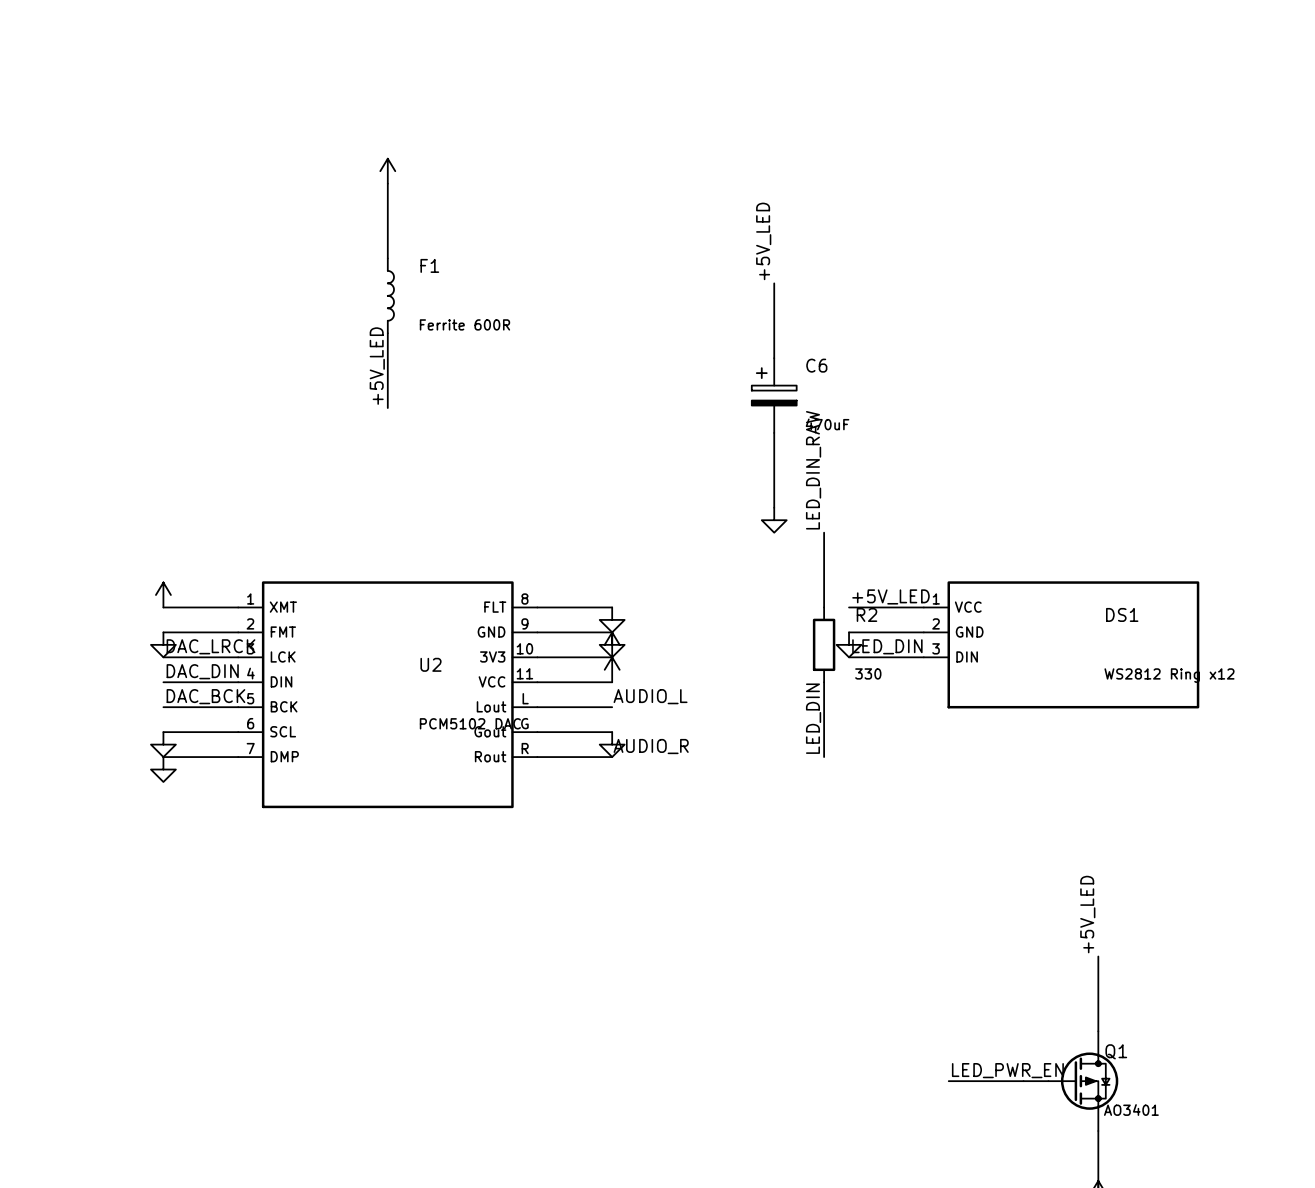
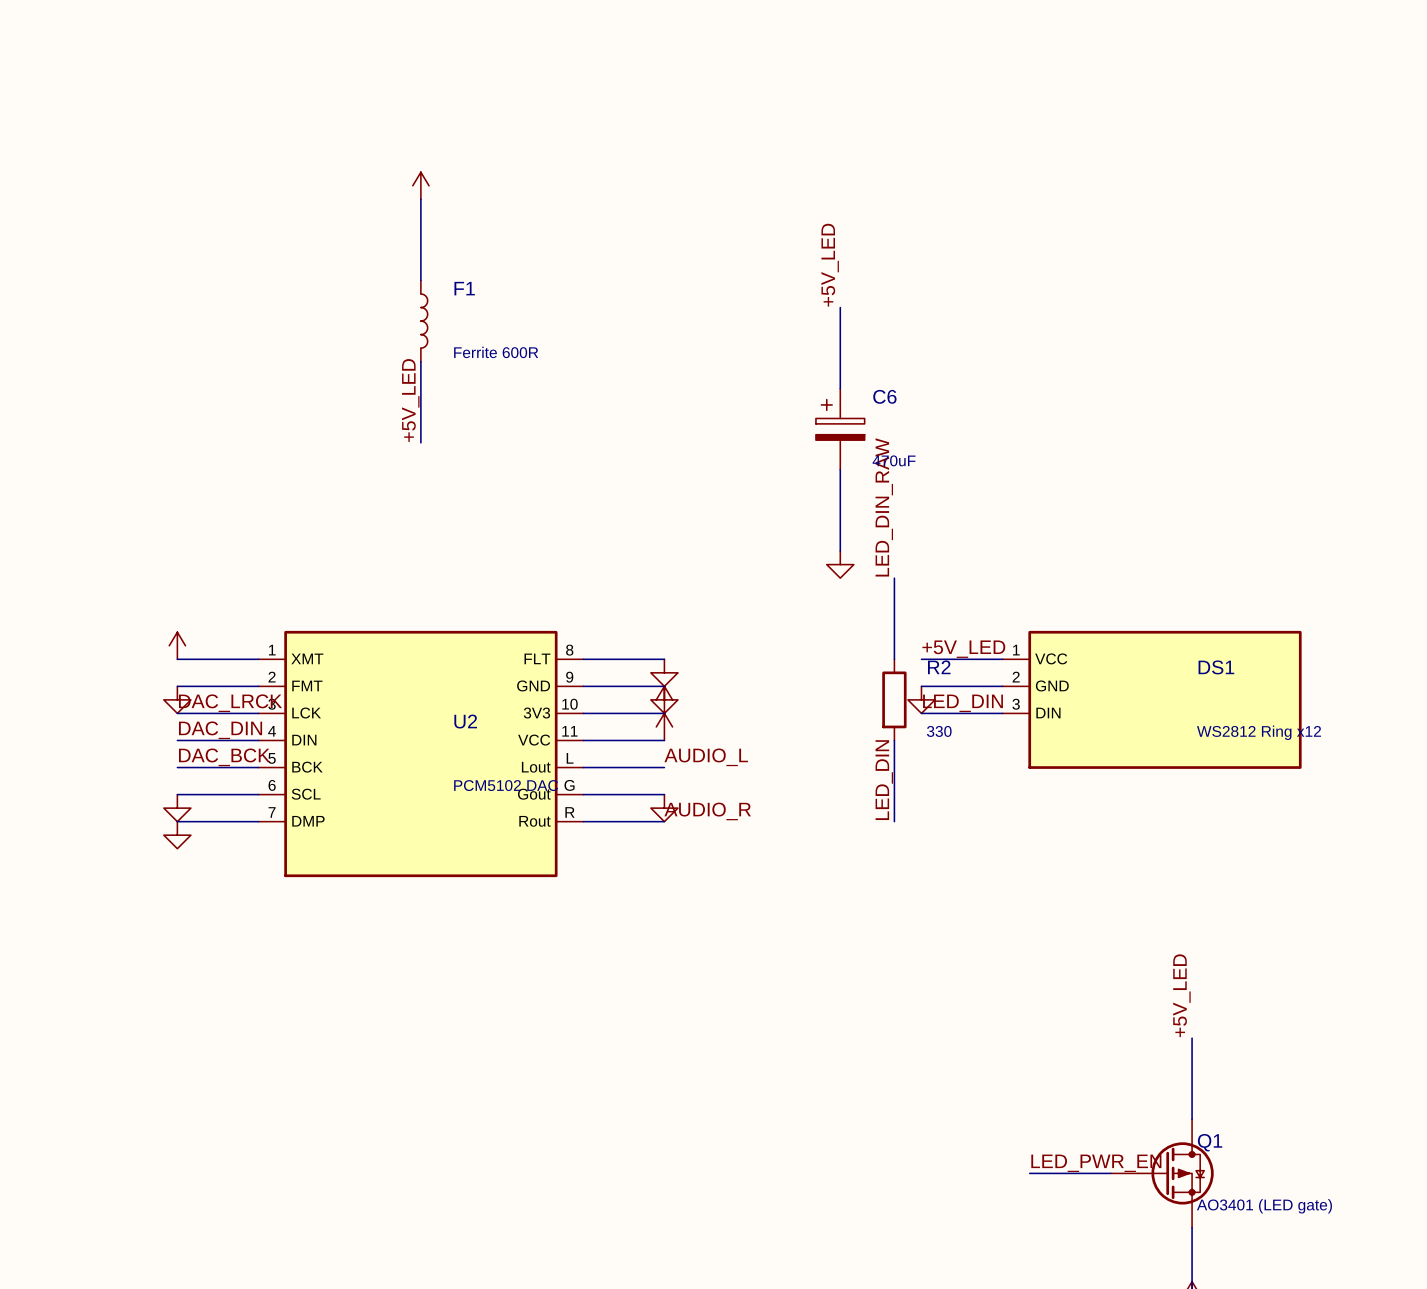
Q1 value: AO3401 (1131, 1110) -> AO3401 (LED gate) (1264, 1206)

